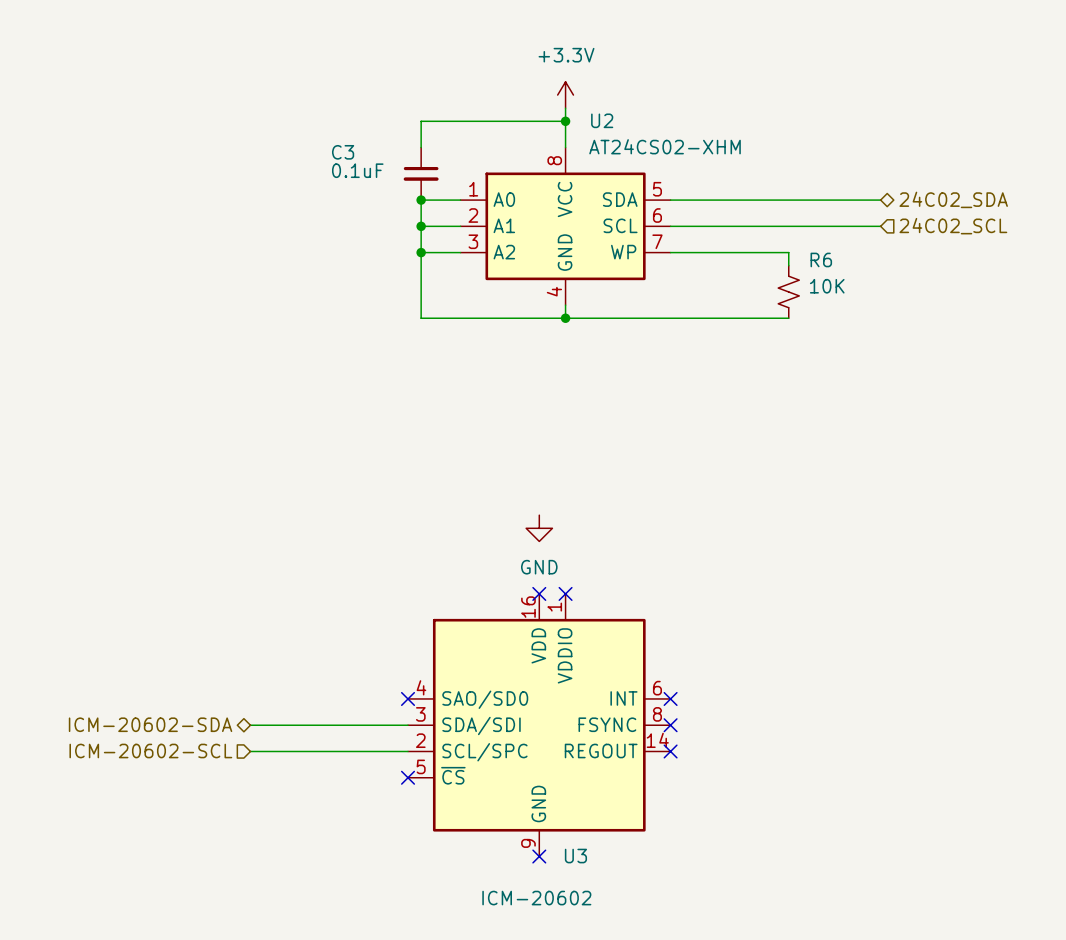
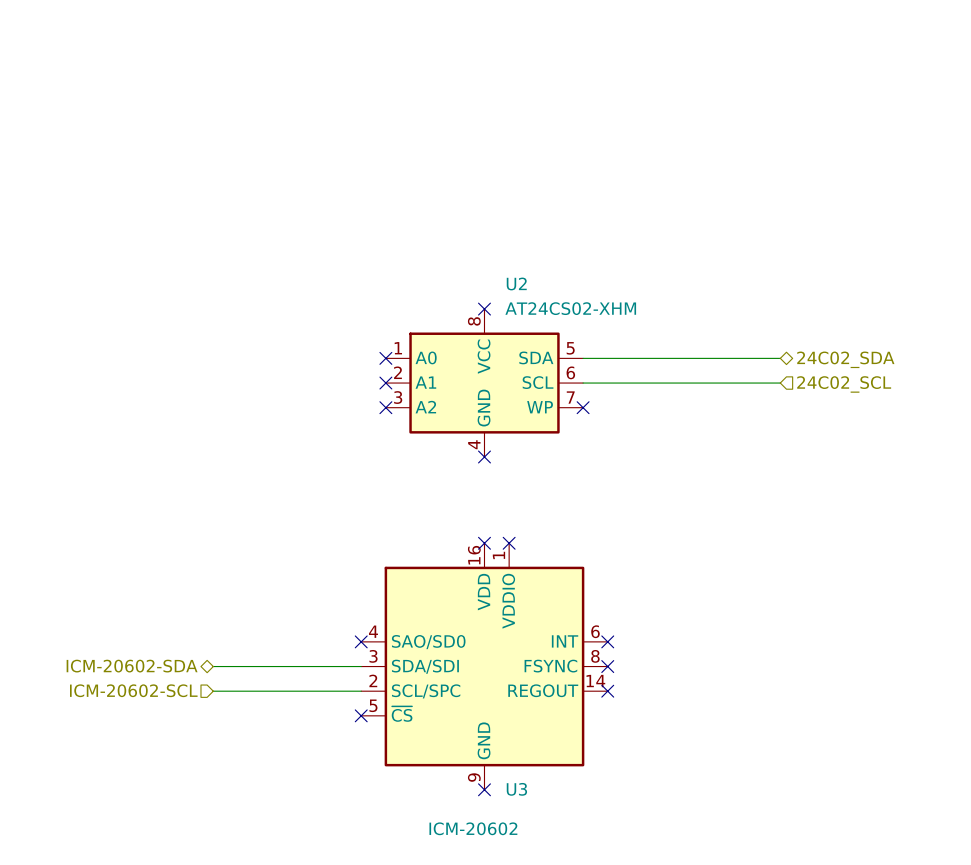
power symbol: +3.3V (565, 95) -> none
wire: (565, 108) (565, 147) -> none
wire: (565, 121) (421, 121) (421, 147) -> none
junction: (565, 121) -> none
C3: 0.1uF (421, 173) -> none
hierarchical label position: 24C02_SDA (953, 199) -> 24C02_SDA (845, 359)
junction: (421, 200) -> none
wire: (460, 200) (421, 200) (421, 318) (788, 318) -> none
wire: (670, 200) (880, 200) -> (583, 358) (780, 358)
wire: (421, 226) (460, 226) -> none
junction: (421, 226) -> none
U2 position: (565, 226) -> (484, 383)
wire: (670, 226) (880, 226) -> (583, 383) (780, 383)
hierarchical label position: 24C02_SCL (953, 226) -> 24C02_SCL (844, 384)
wire: (421, 252) (460, 252) -> none
junction: (421, 252) -> none
wire: (670, 252) (788, 252) (788, 265) -> none
R6: 10K (788, 291) -> none
junction: (565, 318) -> none
no-connect mark: none -> (484, 309)
no-connect mark: none -> (385, 358)
no-connect mark: none -> (385, 383)
no-connect mark: none -> (385, 407)
no-connect mark: none -> (583, 407)
no-connect mark: none -> (484, 456)
power symbol: GND (539, 528) -> none

